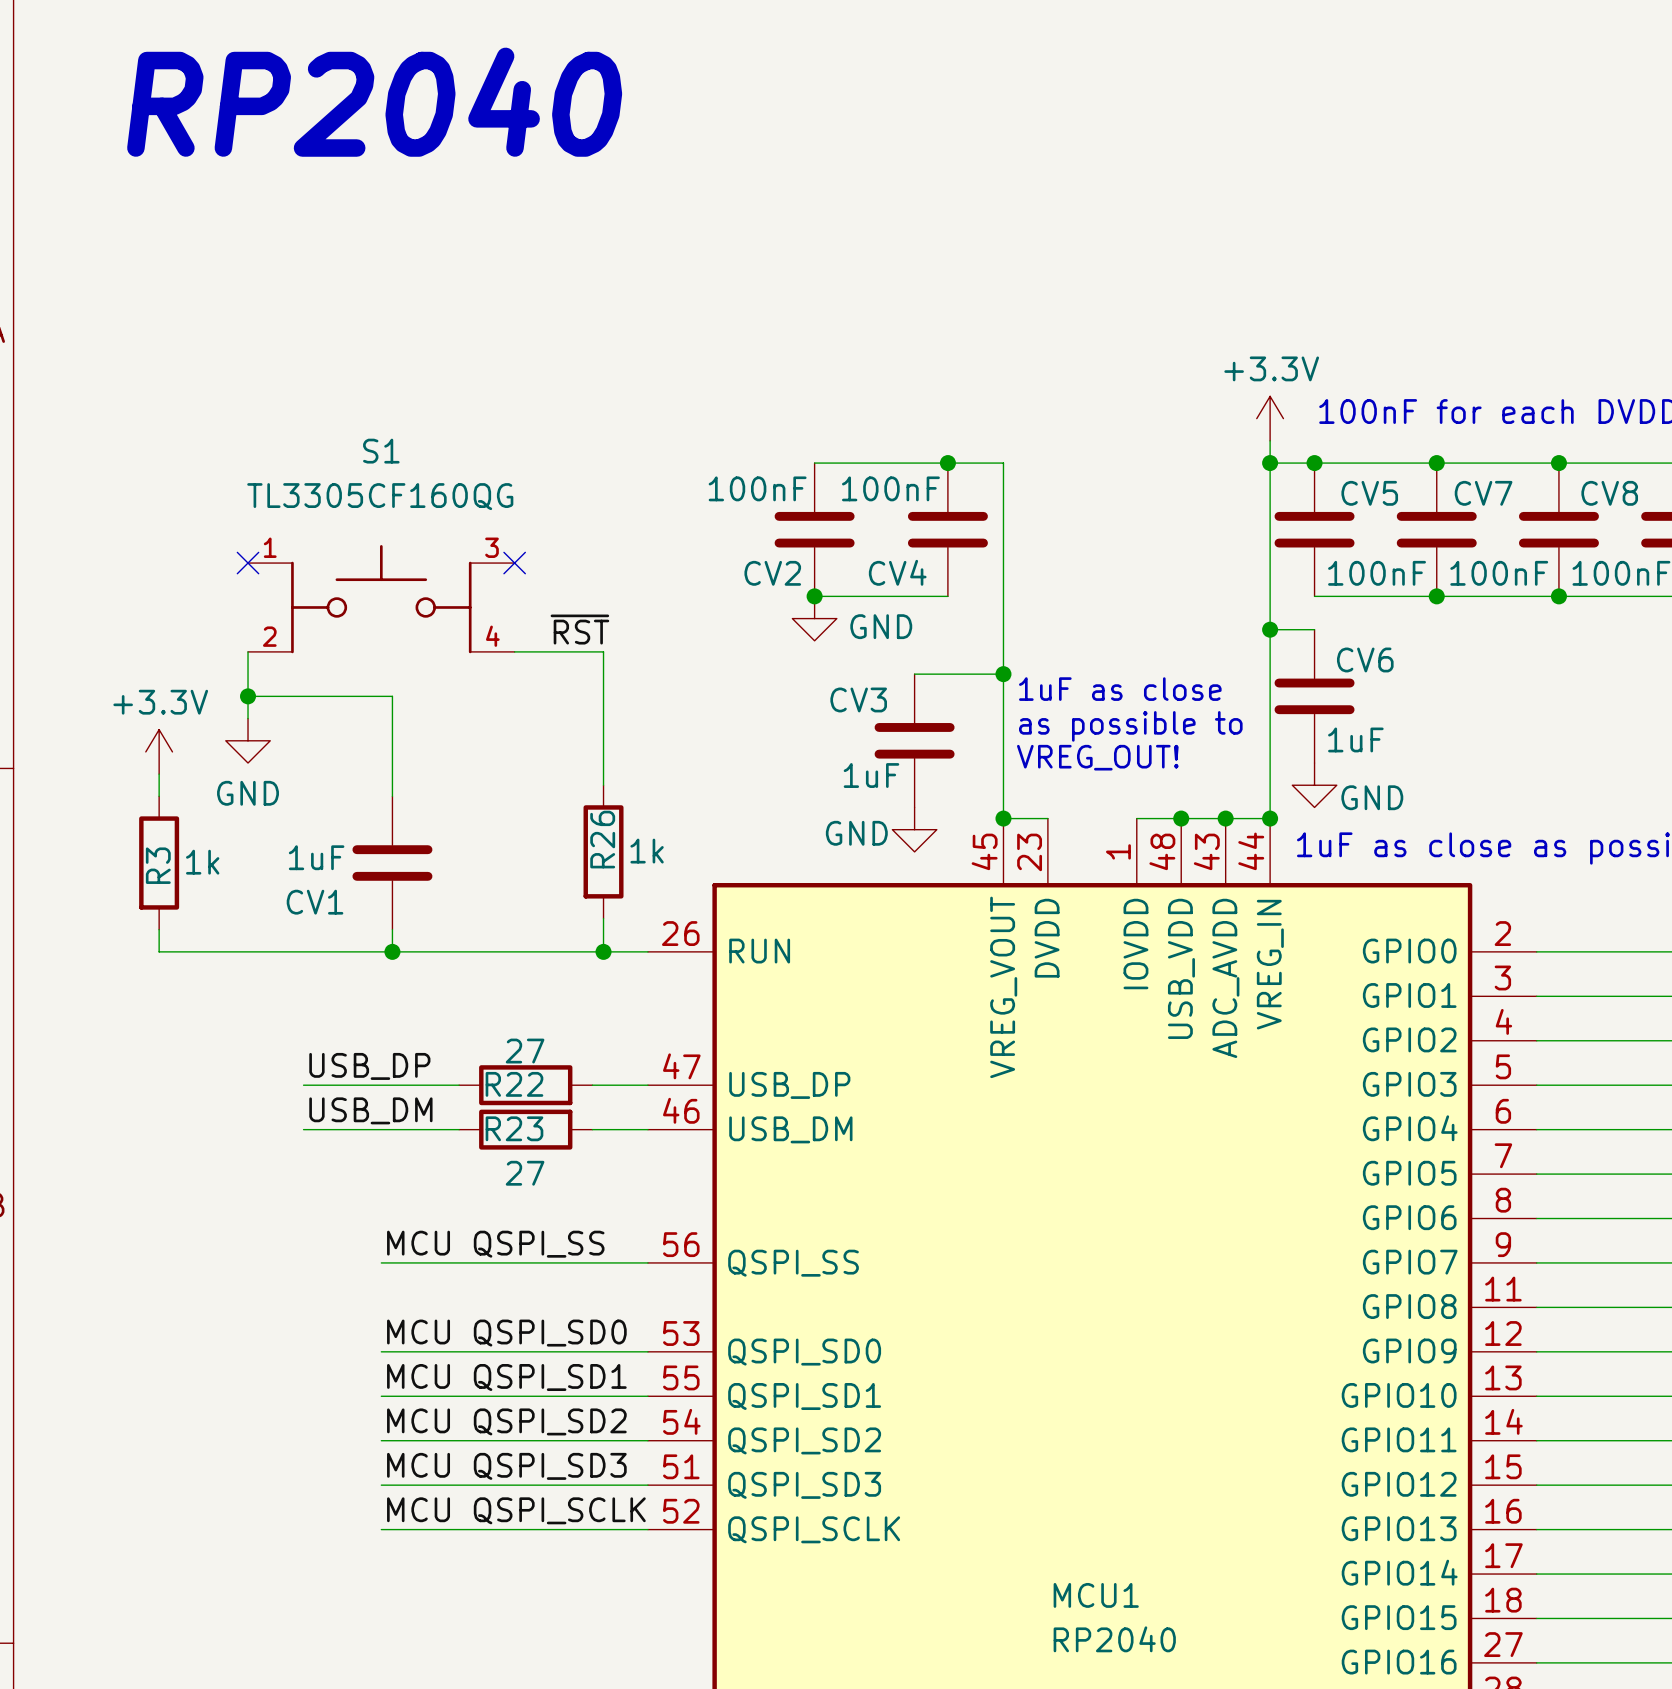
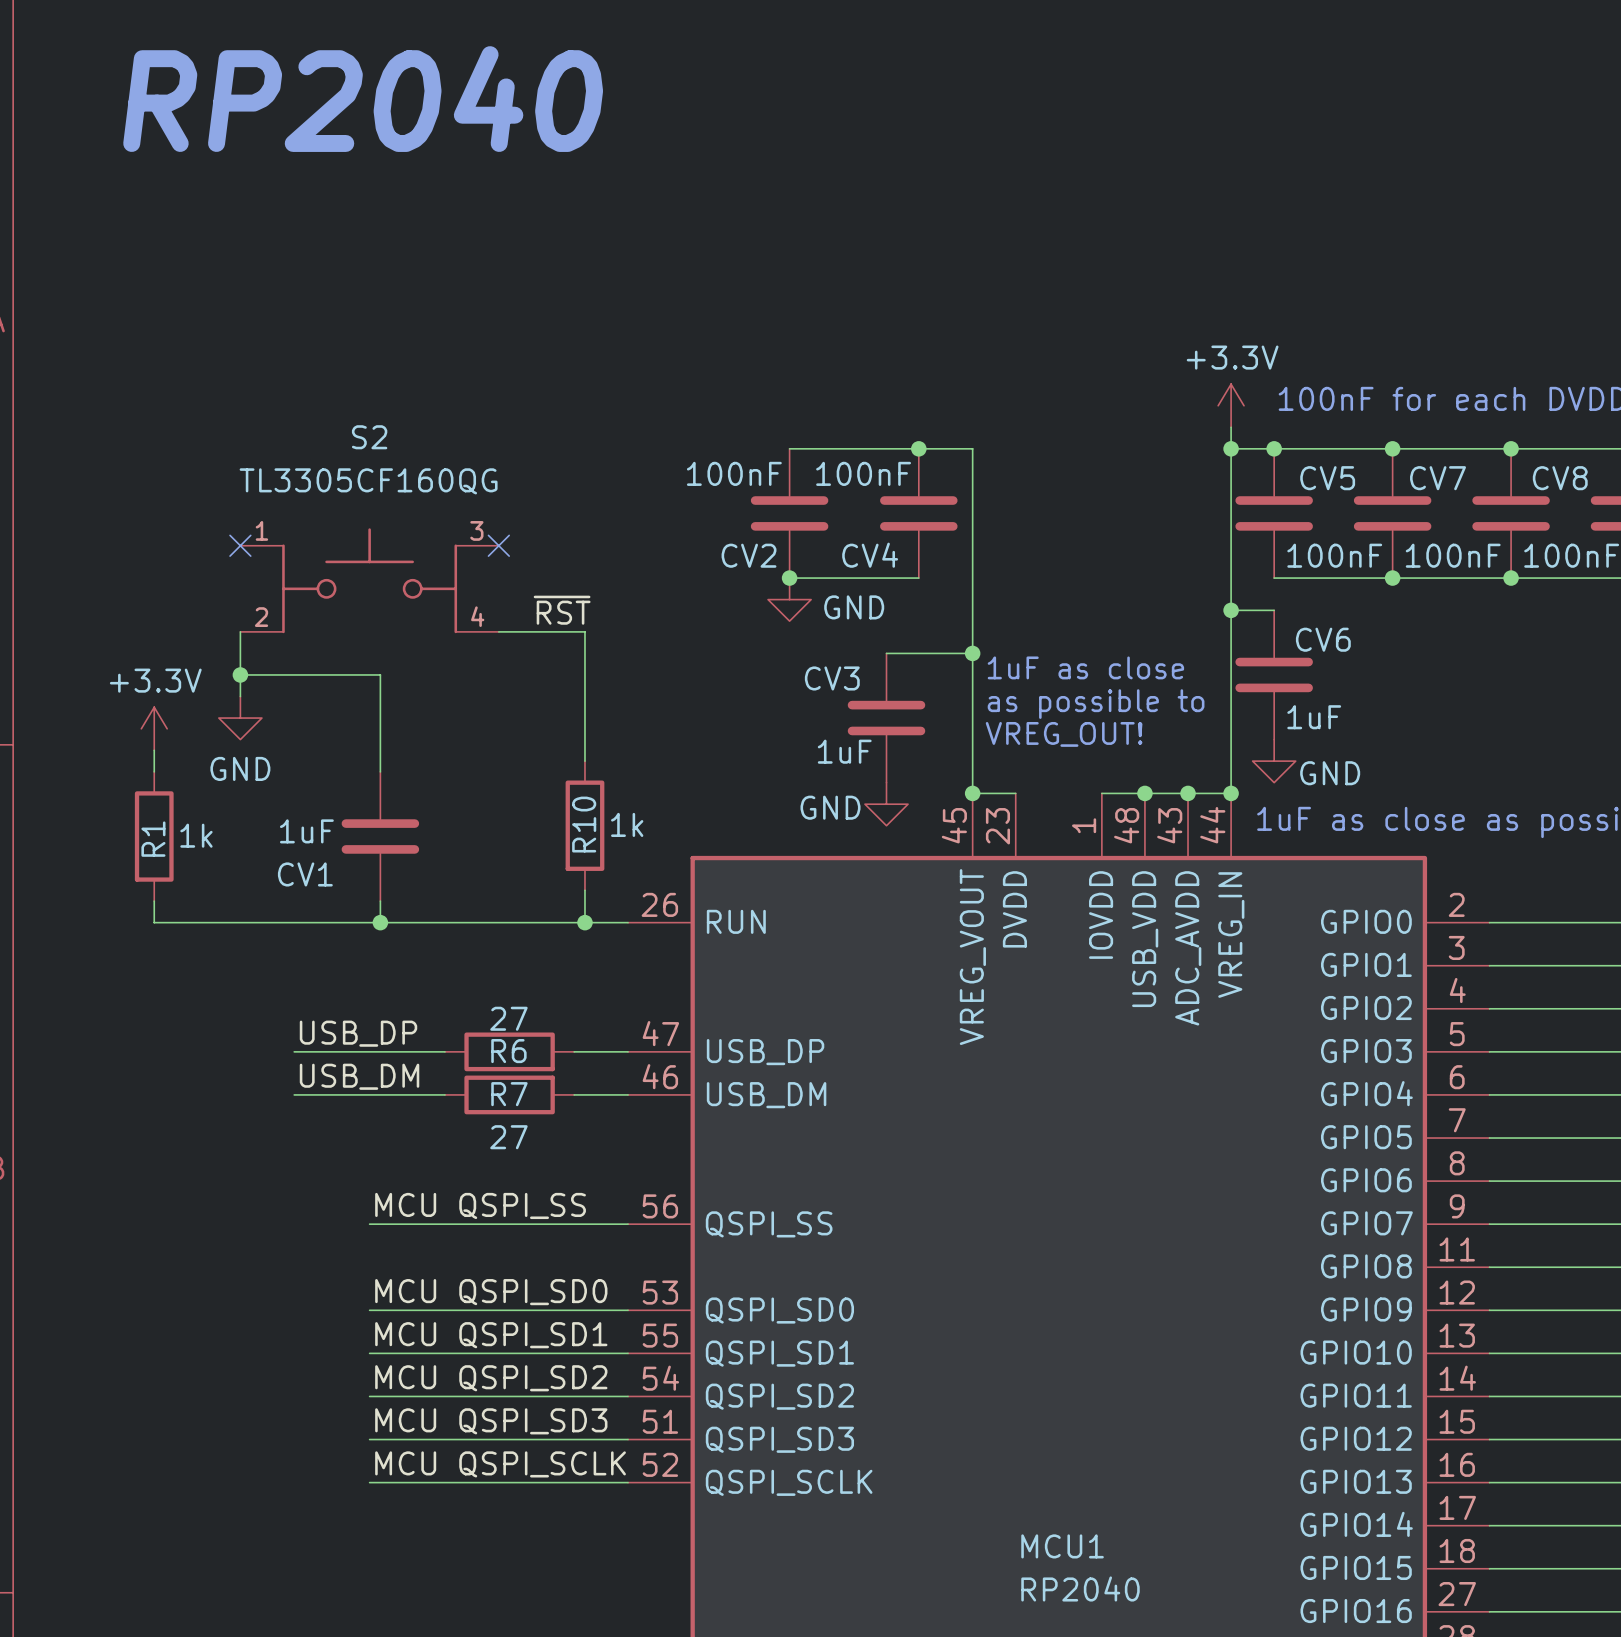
S1 name: S1 (381, 451) -> S2 (369, 437)
R26 name: R26 (602, 839) -> R10 (584, 824)
R3 name: R3 (158, 865) -> R1 (153, 839)
R22 name: R22 (514, 1084) -> R6 (508, 1051)
R23 name: R23 (514, 1128) -> R7 (509, 1094)

